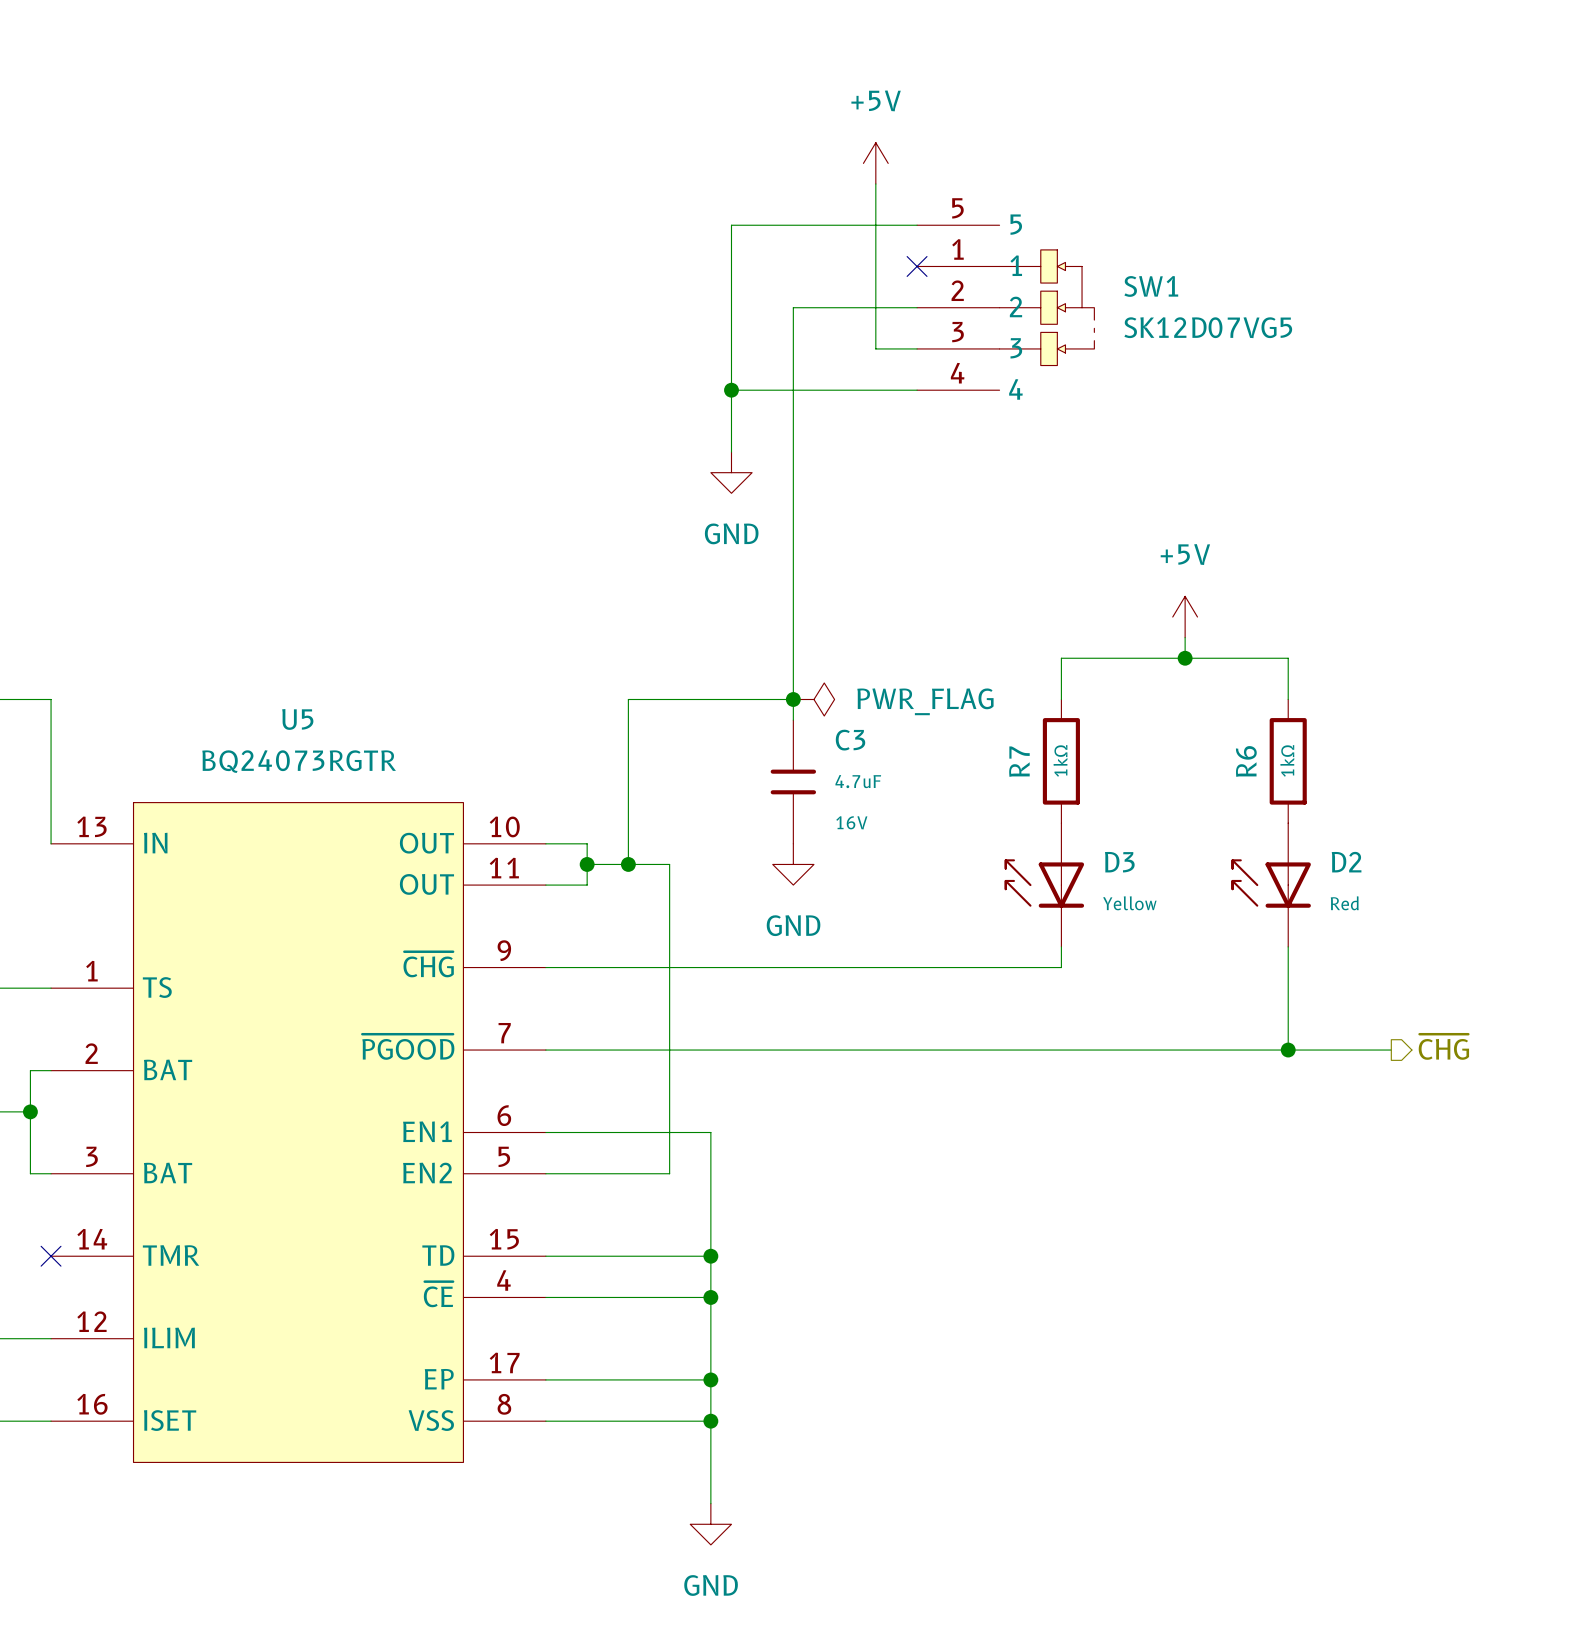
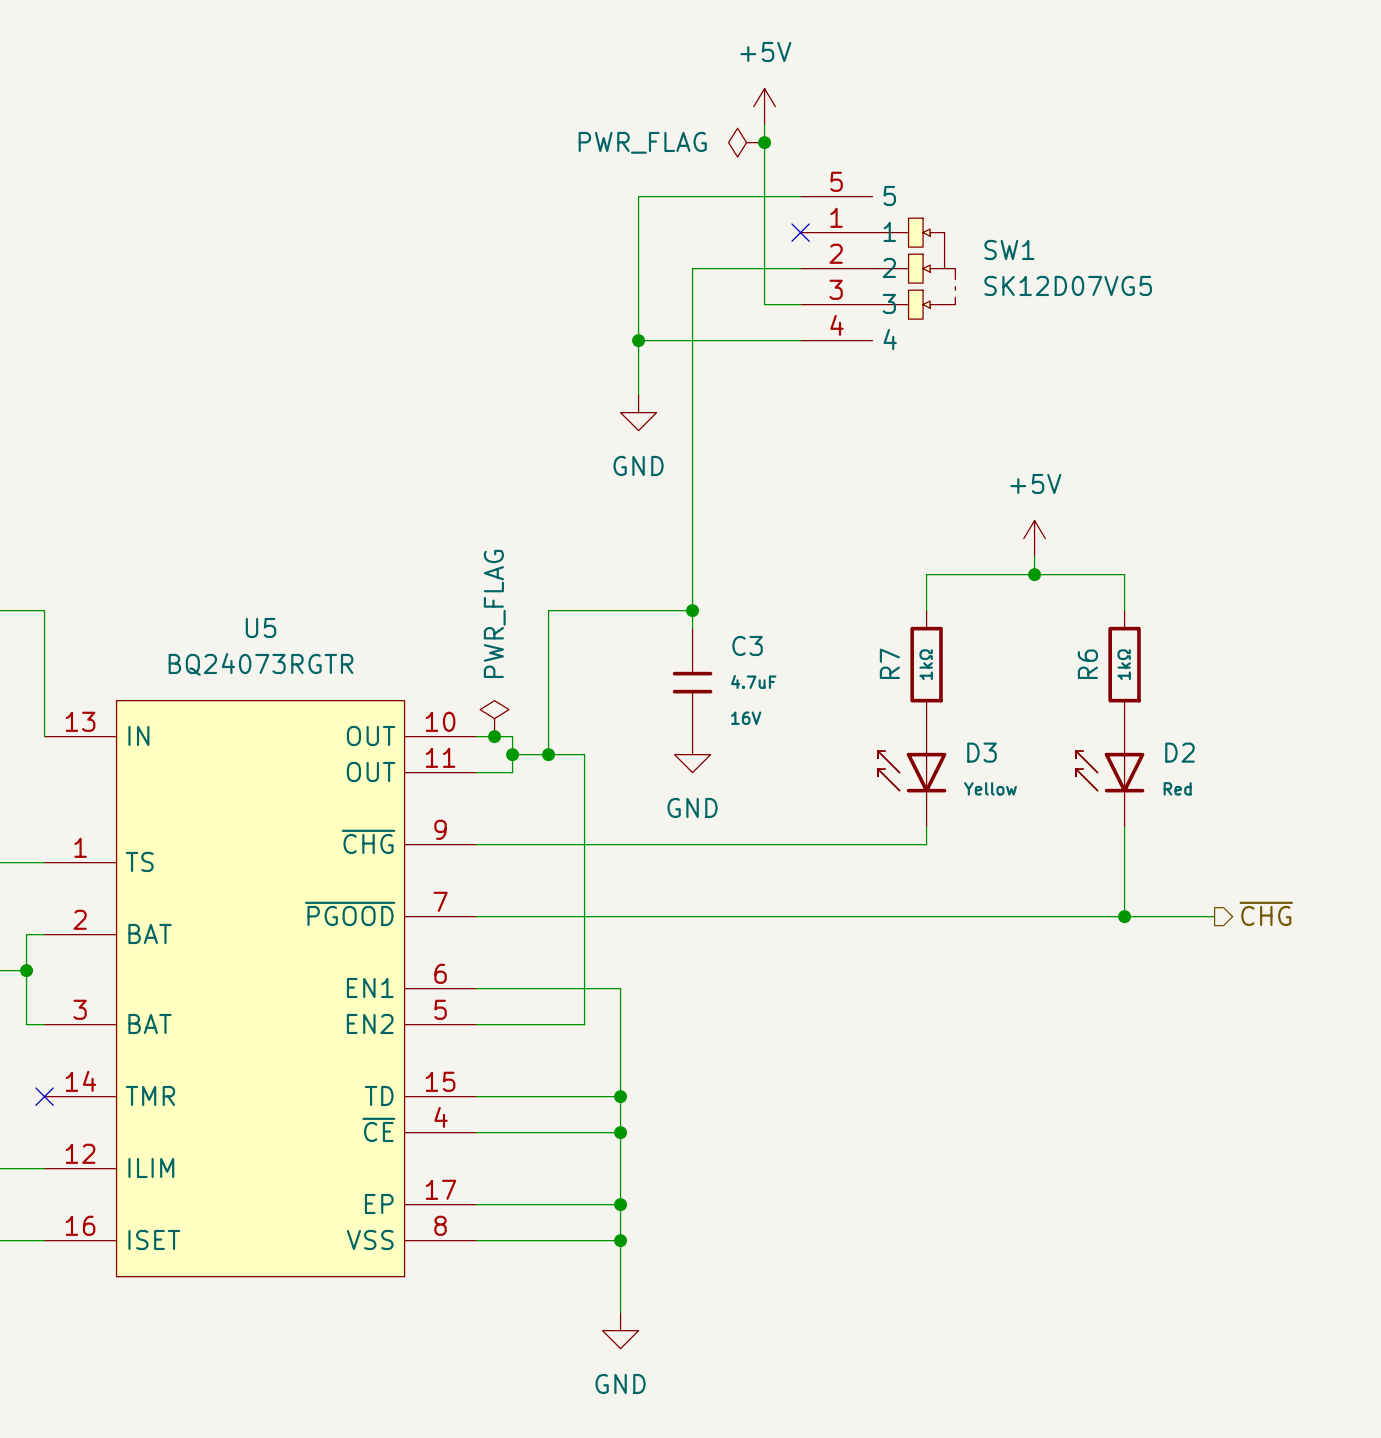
power symbol: none -> PWR_FLAG (746, 142)
power symbol position: +5V (875, 163) -> +5V (764, 106)
junction: none -> (764, 142)
power symbol: PWR_FLAG (813, 699) -> none
power symbol: none -> PWR_FLAG (494, 718)
junction: none -> (494, 736)

